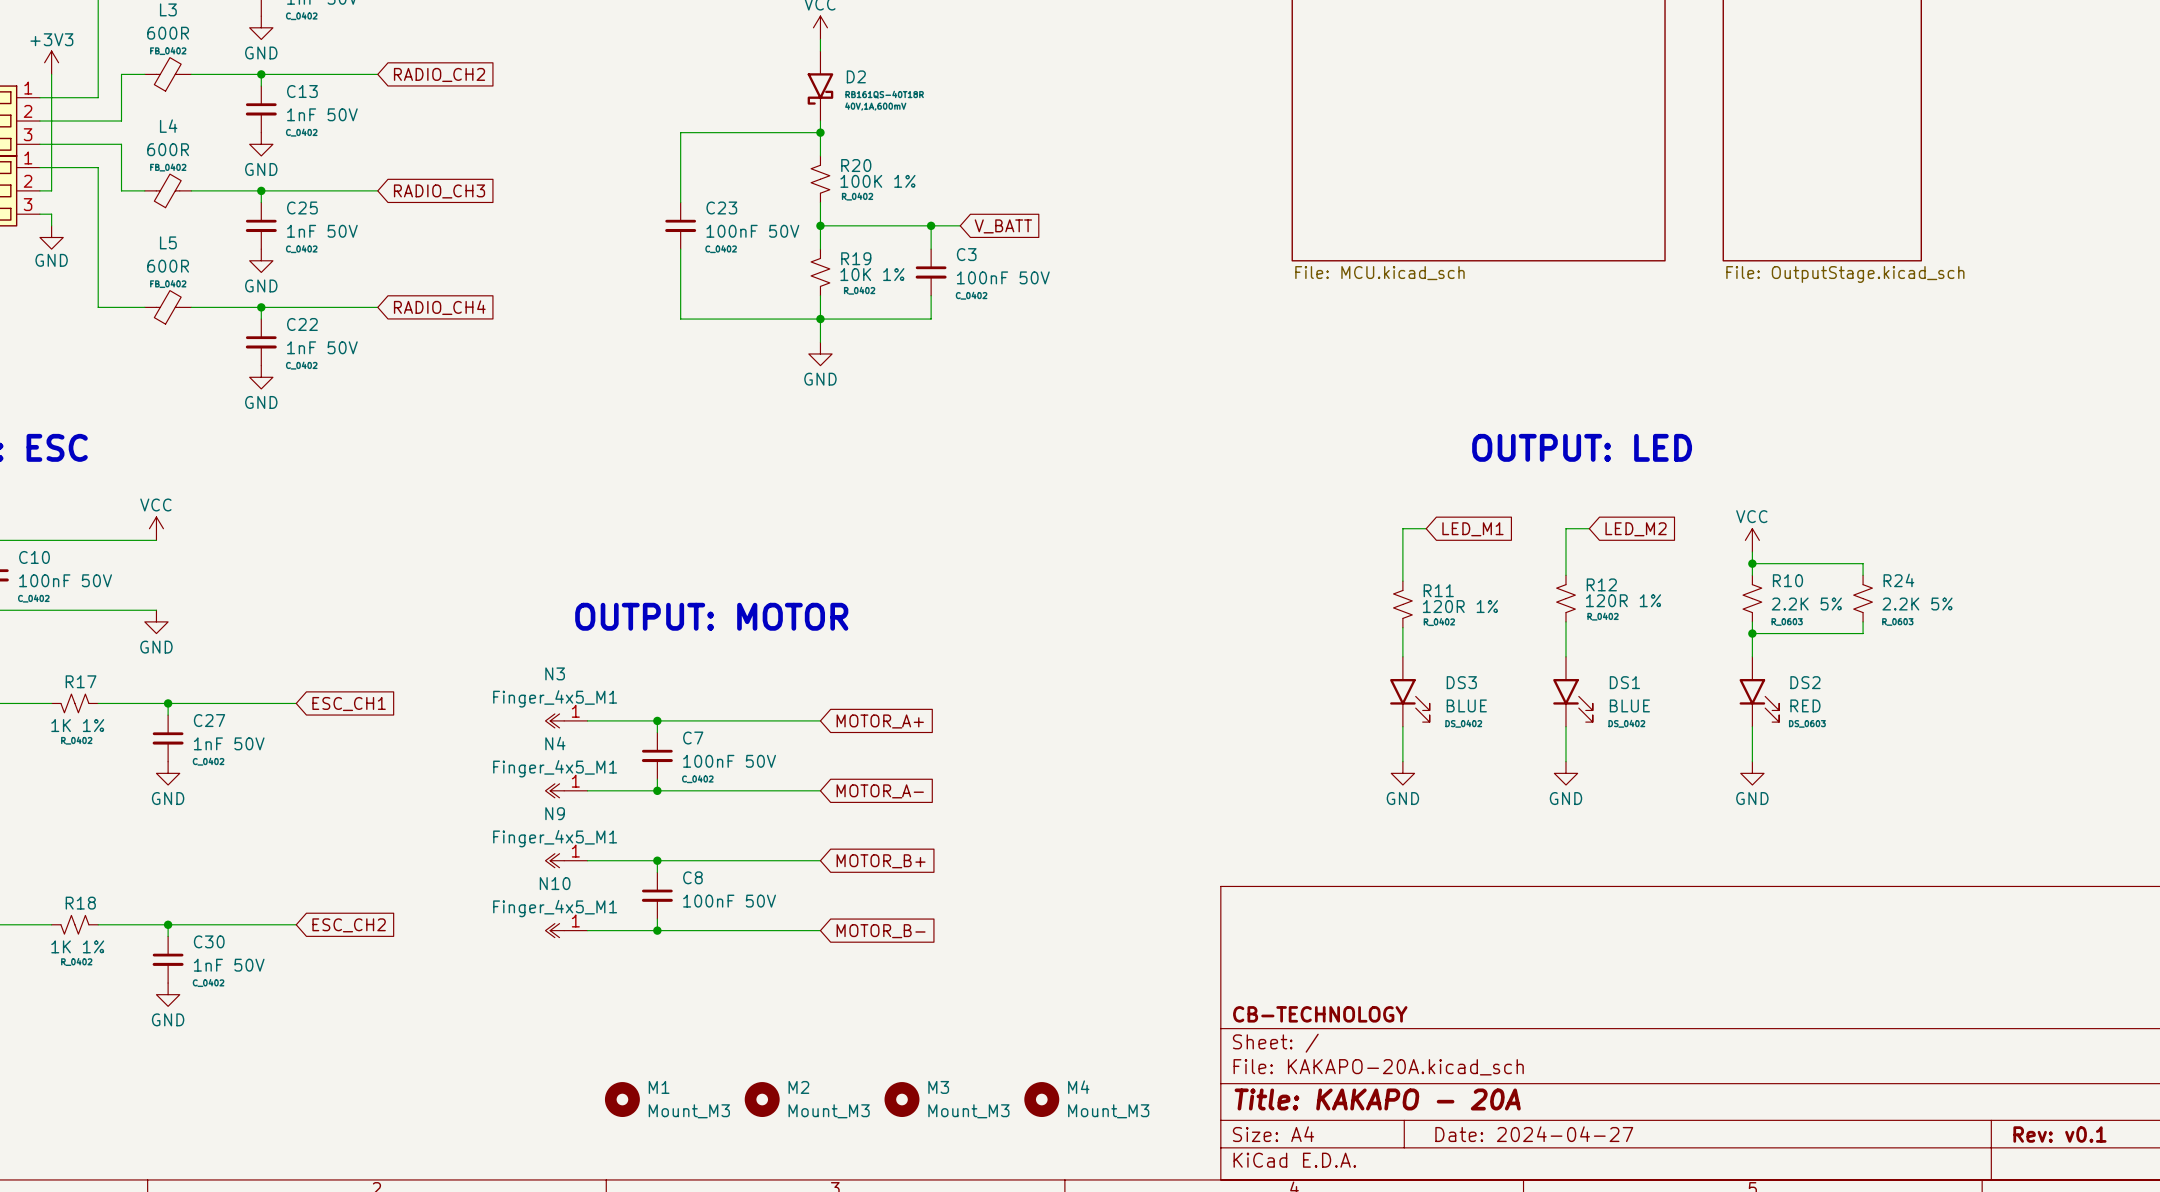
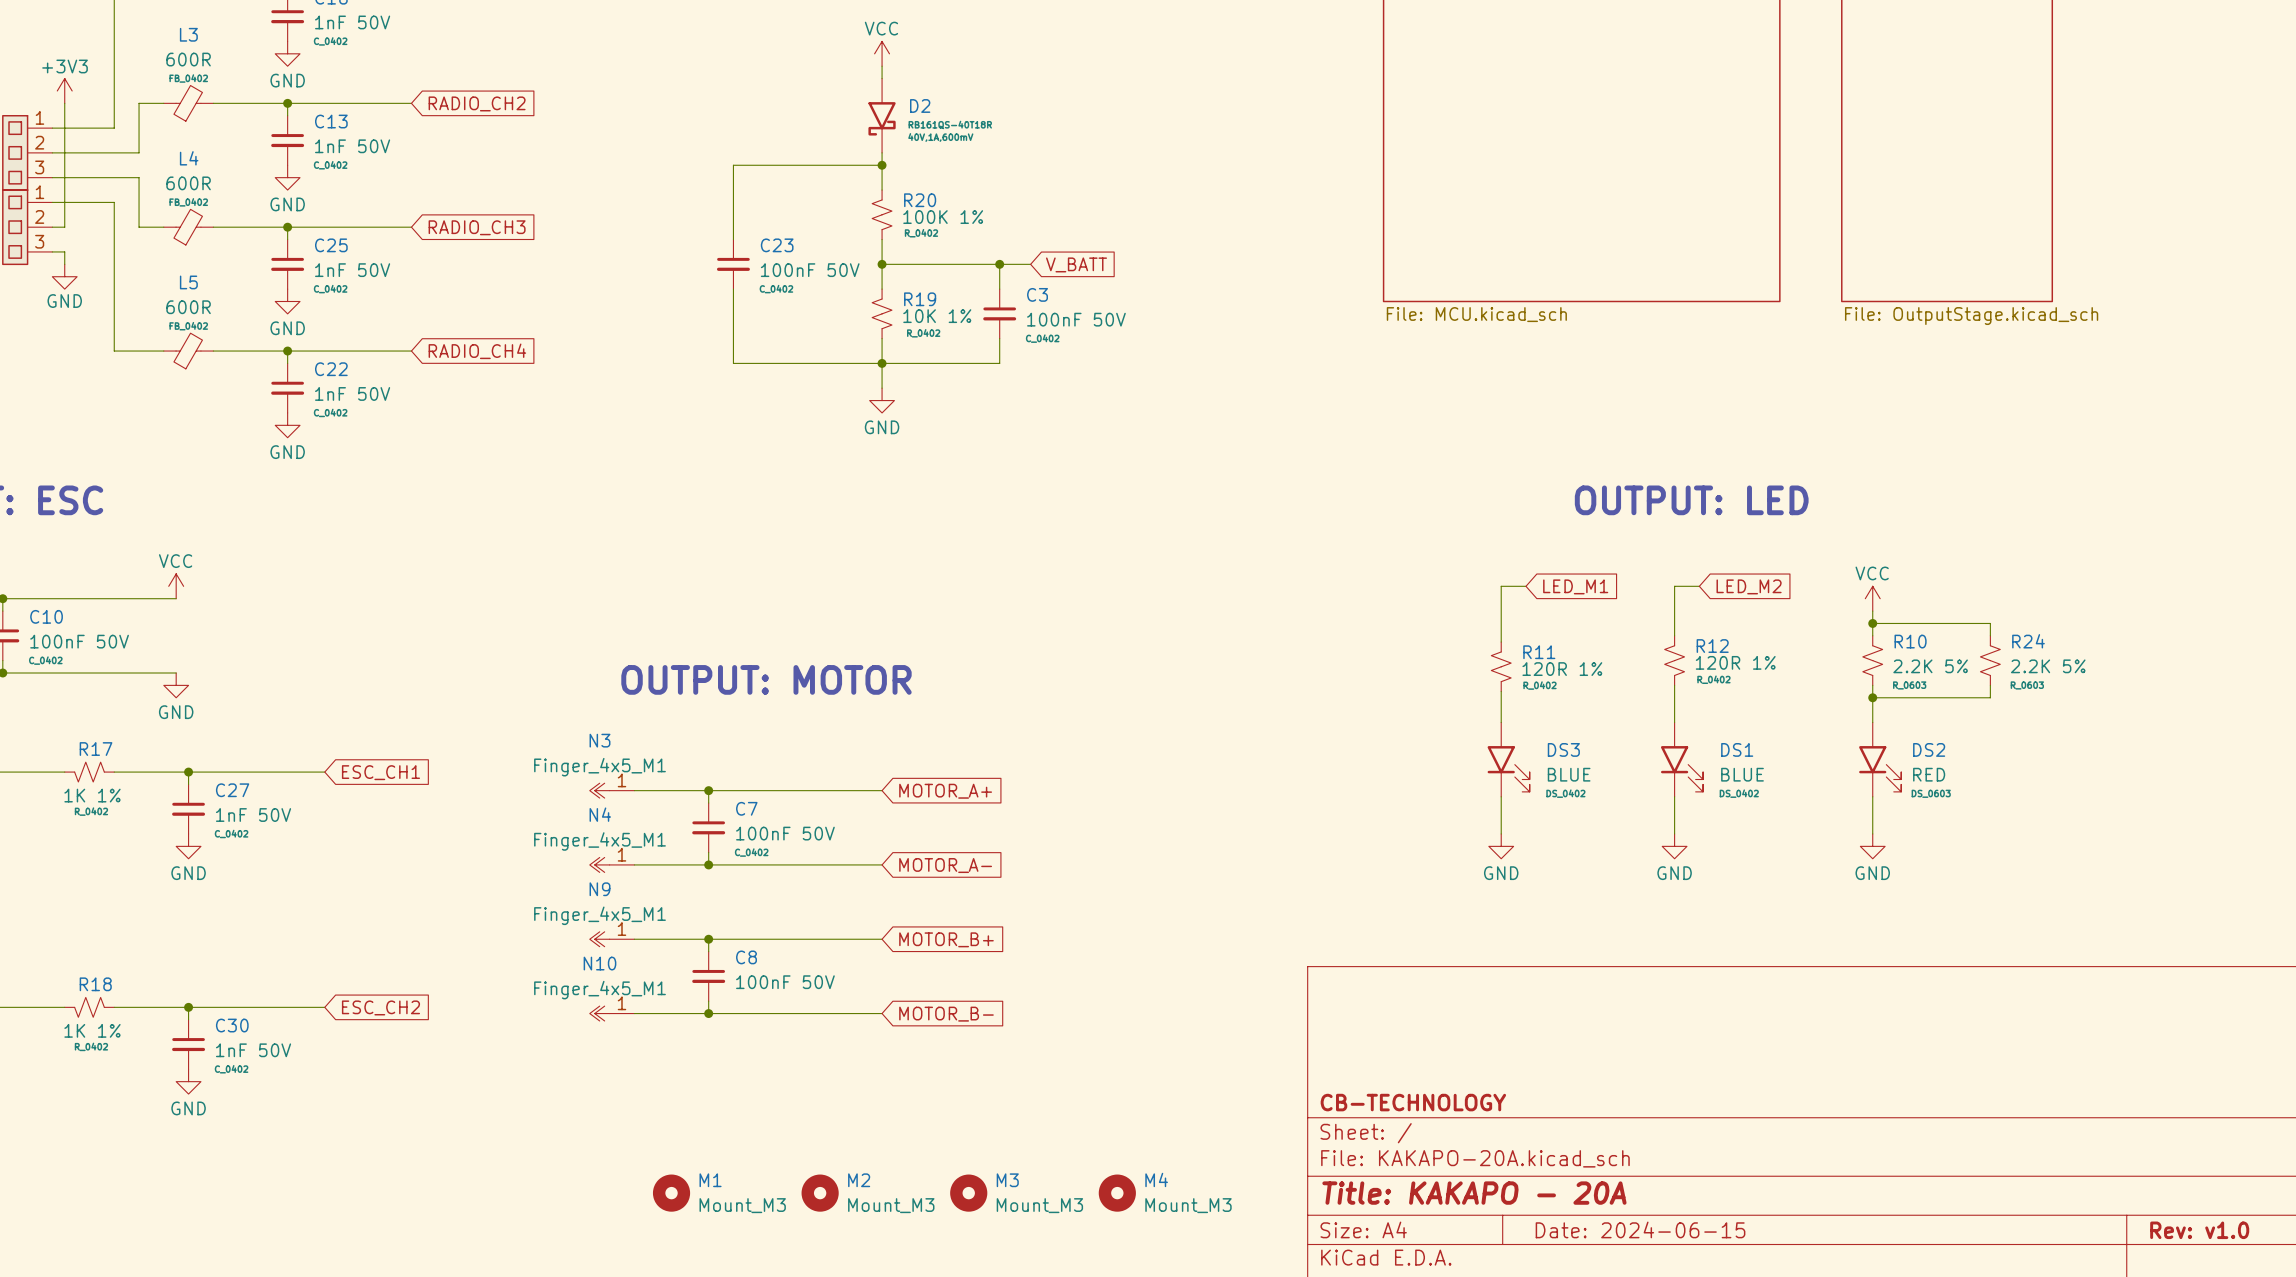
title block: Date: 2024-04-27 (1534, 1134) -> Date: 2024-06-15 (1640, 1229)
title block: Rev: v0.1 (2059, 1134) -> Rev: v1.0 (2199, 1230)

